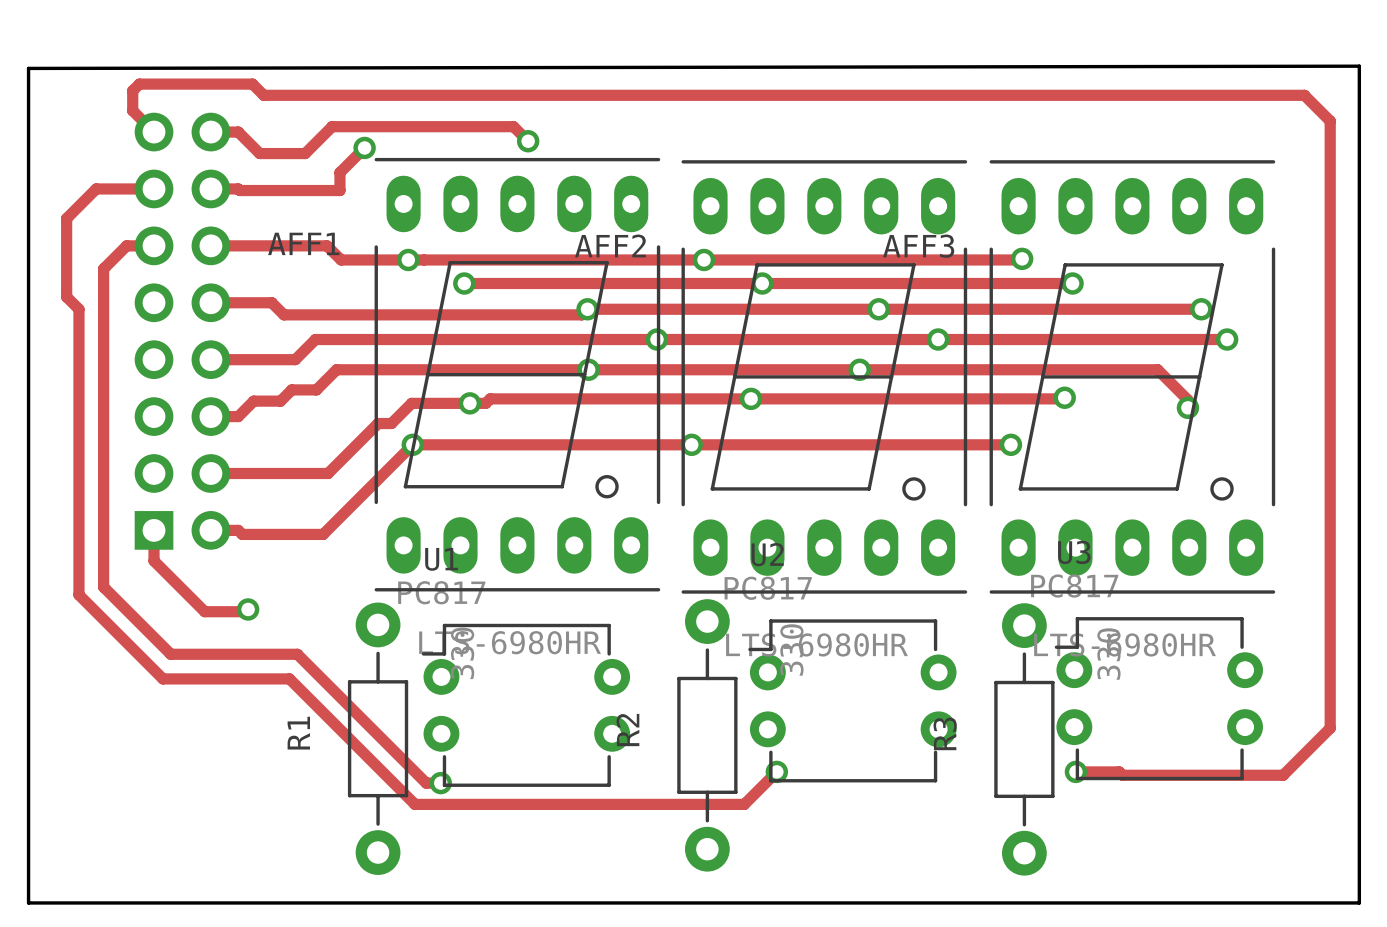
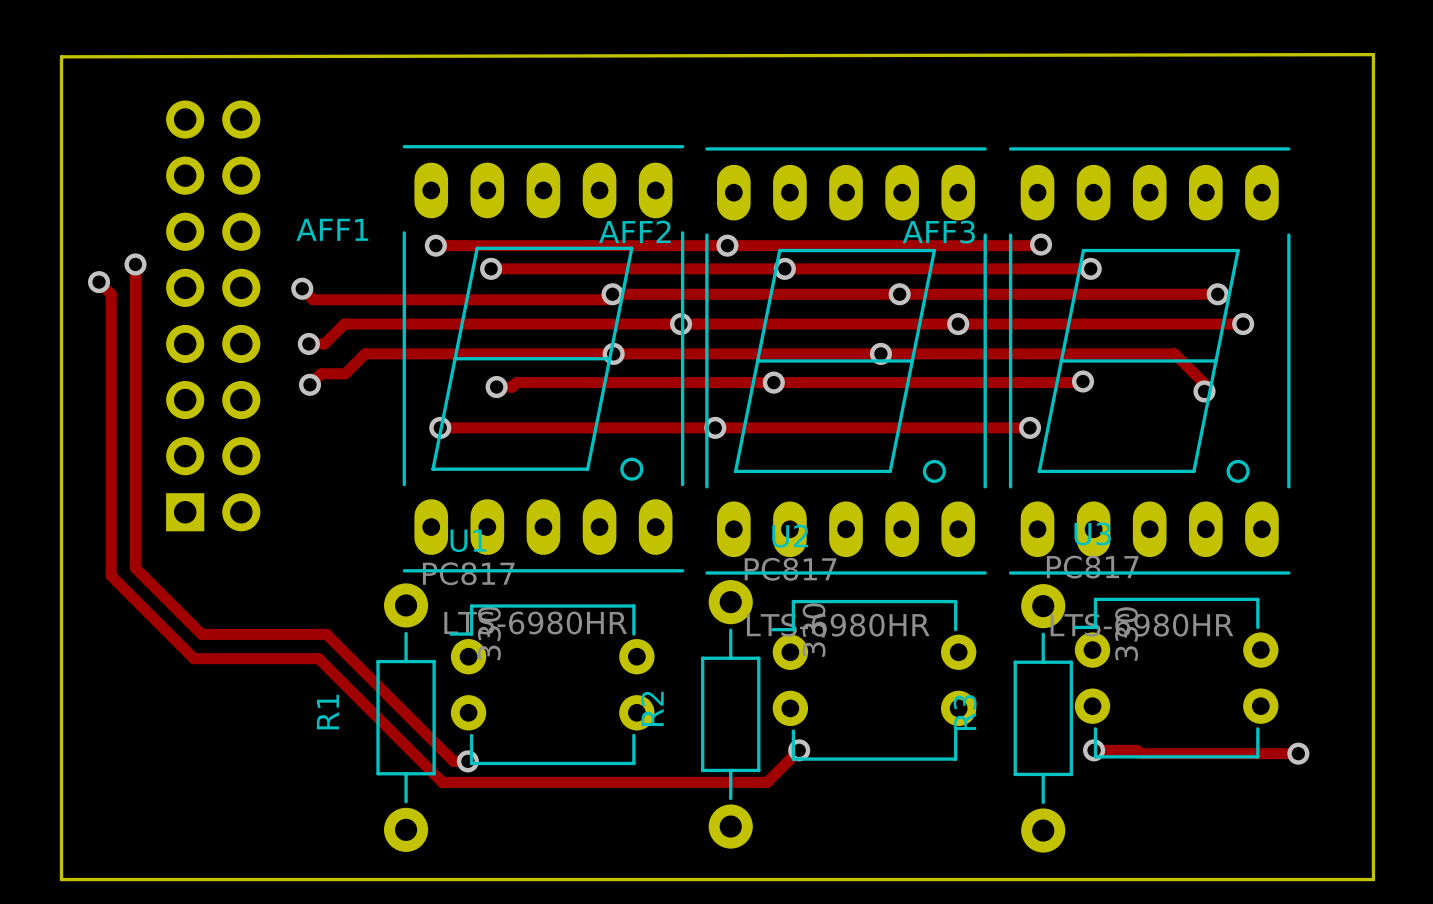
track: (154, 132) (132, 110) (132, 90) (139, 84) (252, 84) (263, 95) (1304, 95) (1330, 121) (1330, 728) (1283, 775) -> none
track: (210, 132) (238, 132) (259, 153) (305, 153) (332, 126) (513, 126) (528, 141) -> none
via: (528, 141) -> none
track: (364, 147) (339, 172) (339, 190) (210, 188) -> none
via: (364, 147) -> none
track: (154, 188) (96, 188) (66, 218) (66, 296) -> none
track: (154, 245) (126, 245) (103, 268) (103, 279) -> none
track: (210, 245) (326, 245) (341, 259) (408, 259) -> none
via: none -> (135, 264)
via: none -> (99, 282)
track: (210, 302) (272, 303) -> none
via: none -> (302, 288)
track: (210, 359) (279, 359) -> none
via: none -> (308, 343)
track: (280, 401) (253, 401) (238, 416) (210, 416) -> none
via: none -> (309, 384)
track: (469, 403) (411, 403) (391, 423) (378, 423) (328, 473) (210, 473) -> none
track: (412, 444) (323, 534) (242, 534) (238, 530) (210, 530) -> none
track: (154, 530) (154, 560) (204, 611) (245, 611) (248, 609) -> none
via: (248, 609) -> none
via: none -> (1298, 753)

